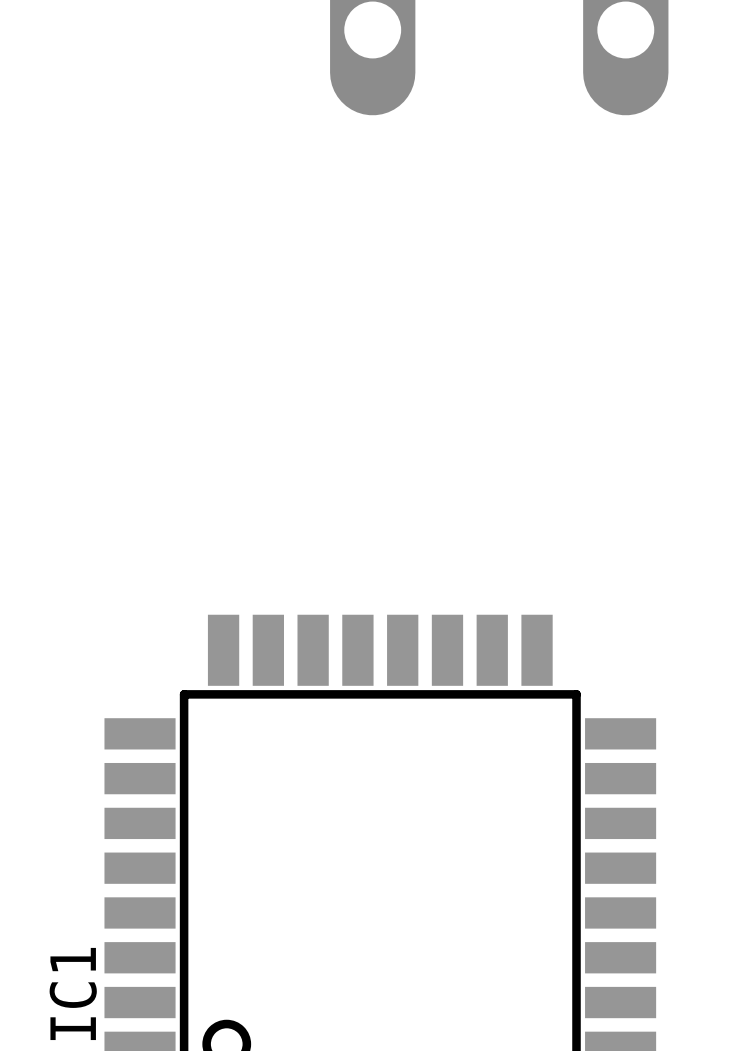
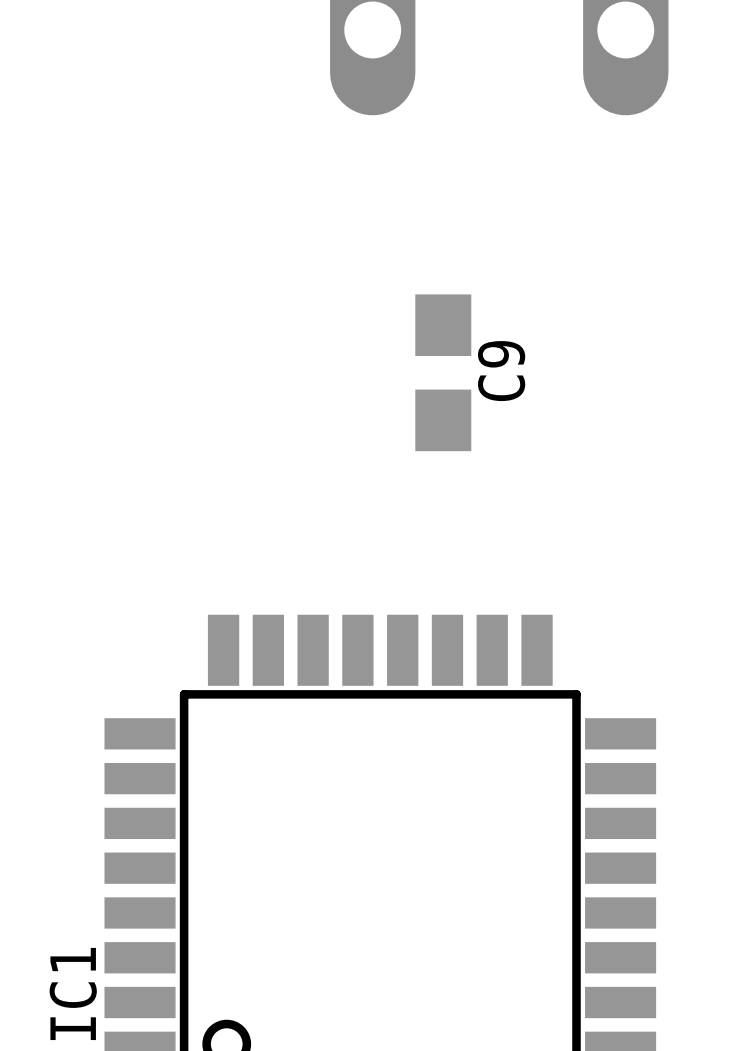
C9: none -> (443, 372)

